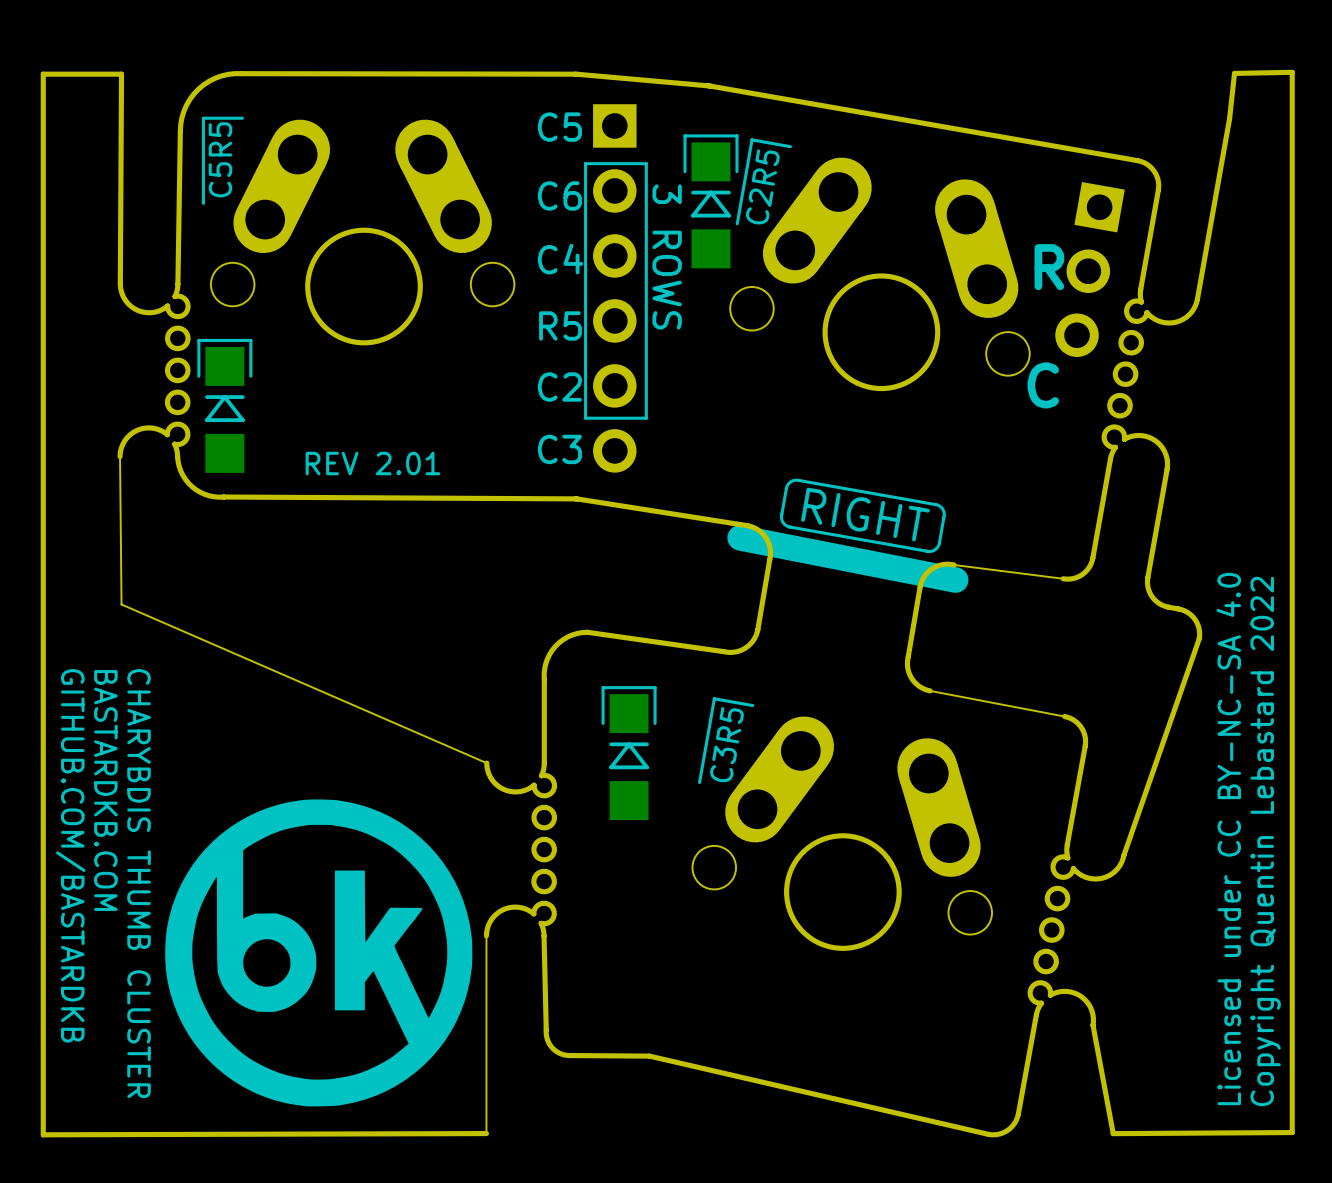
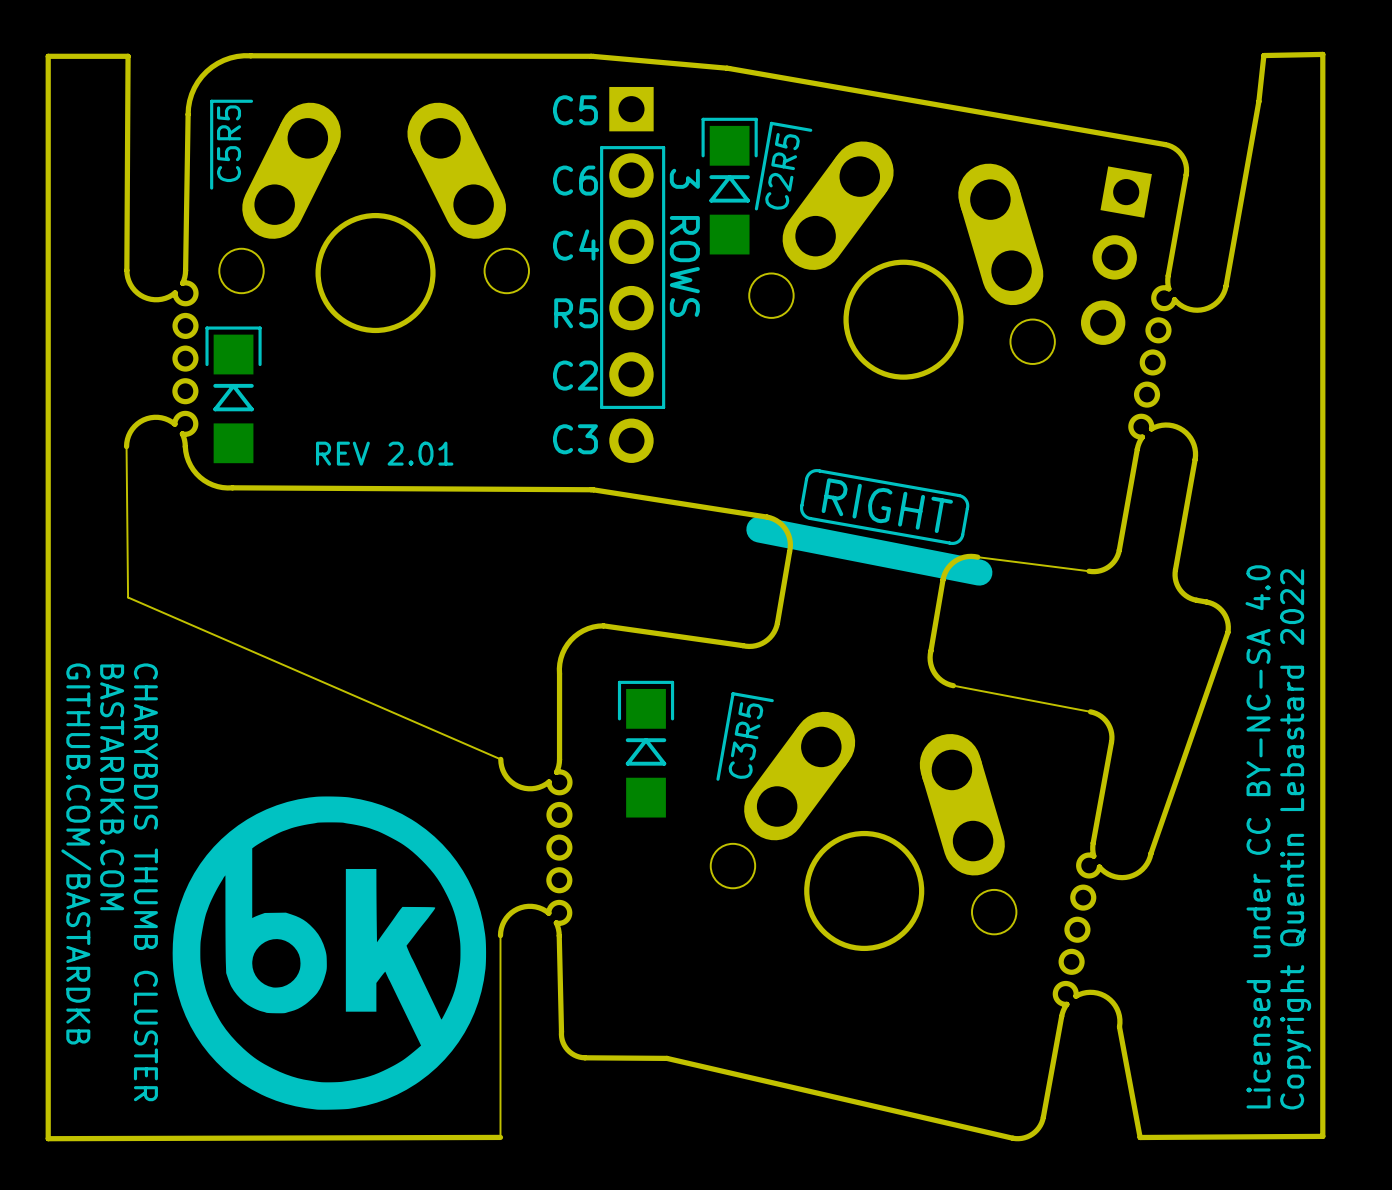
text: R (1049, 267) -> none
text: C (1043, 385) -> none

